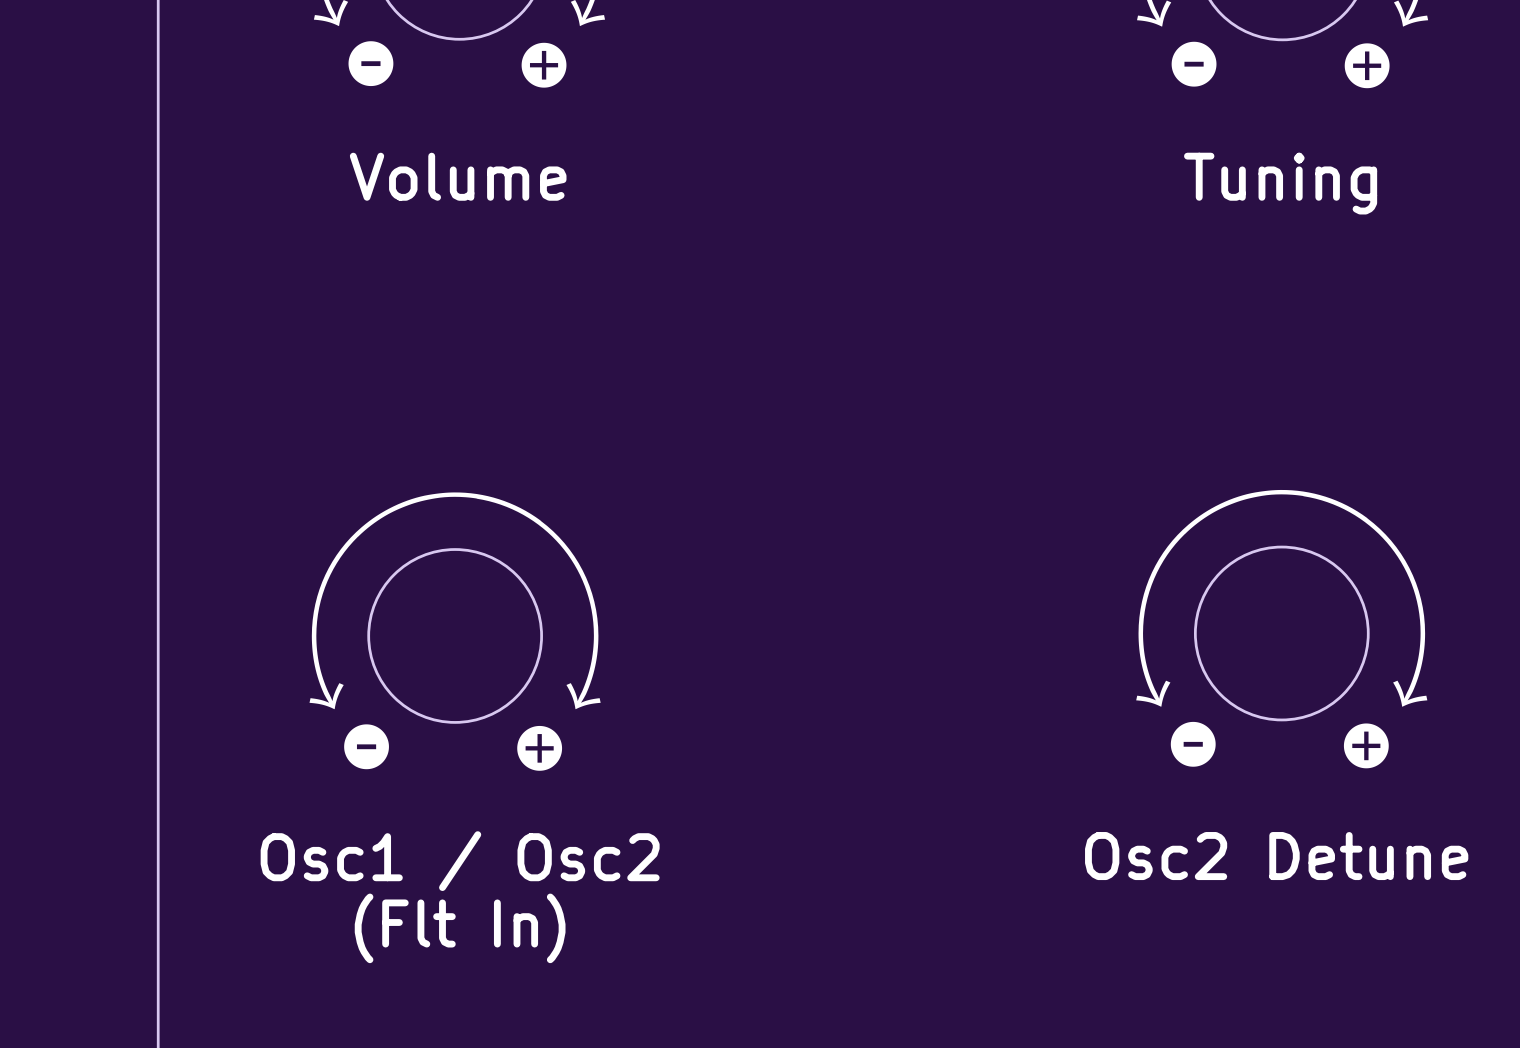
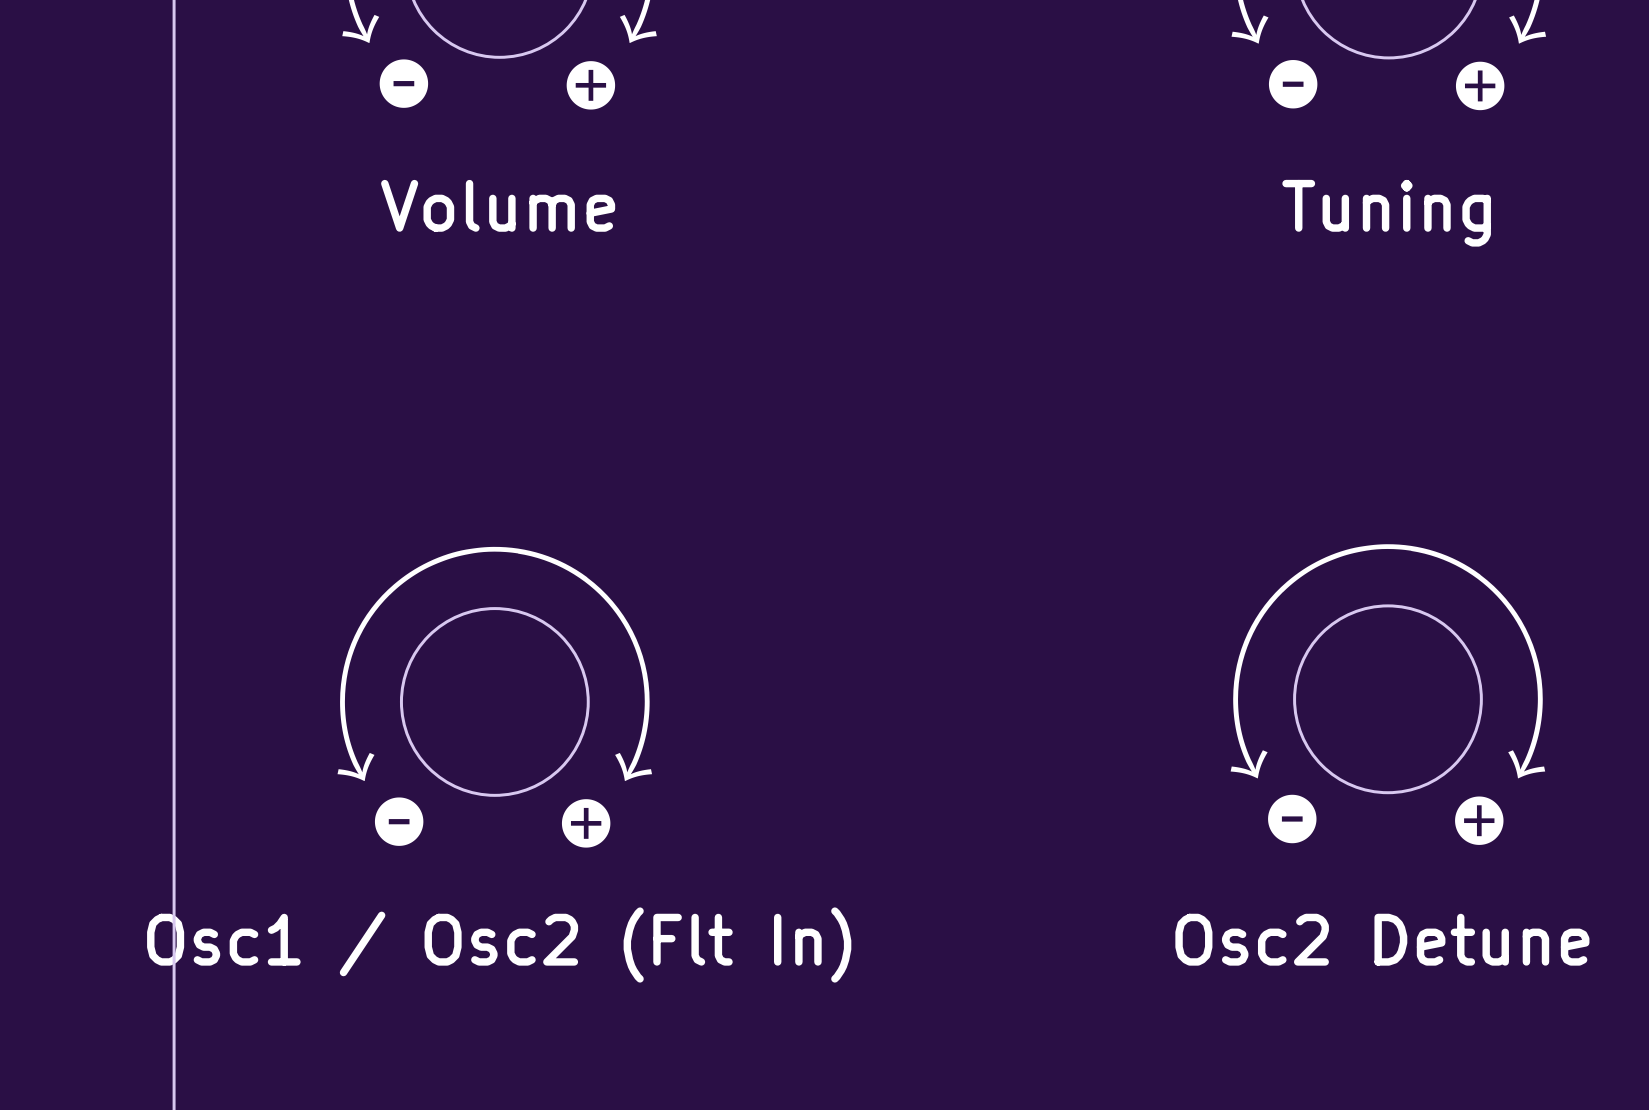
text: Osc1 / Osc2 (460, 861) -> Osc1 / Osc2 (Flt In) (499, 945)
text: (Flt In) (460, 928) -> none

